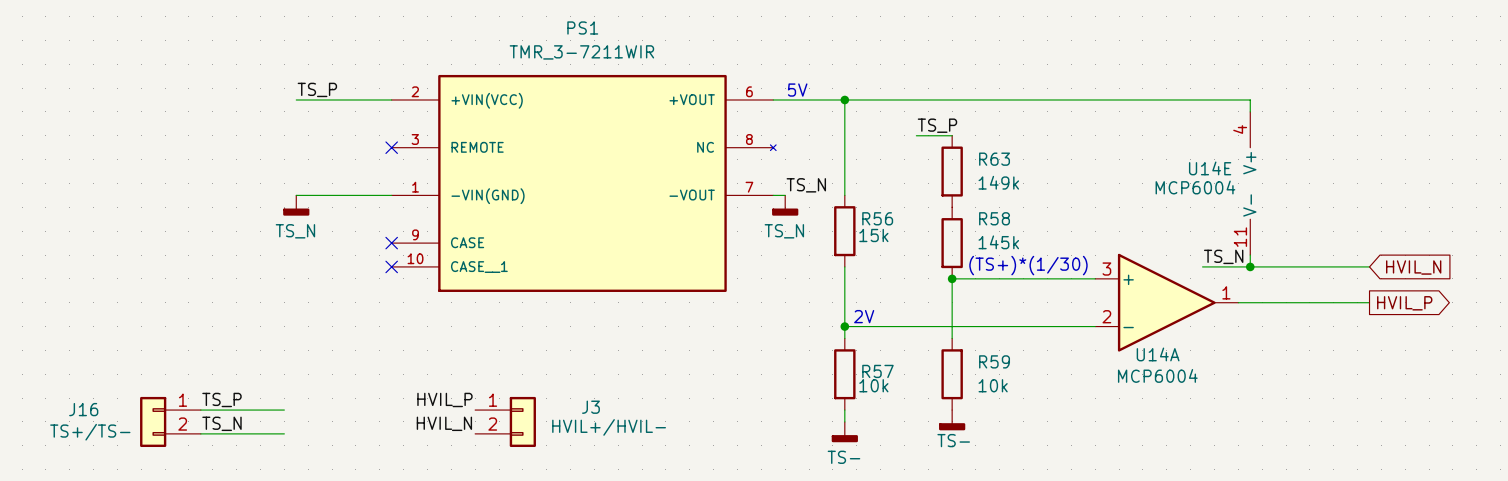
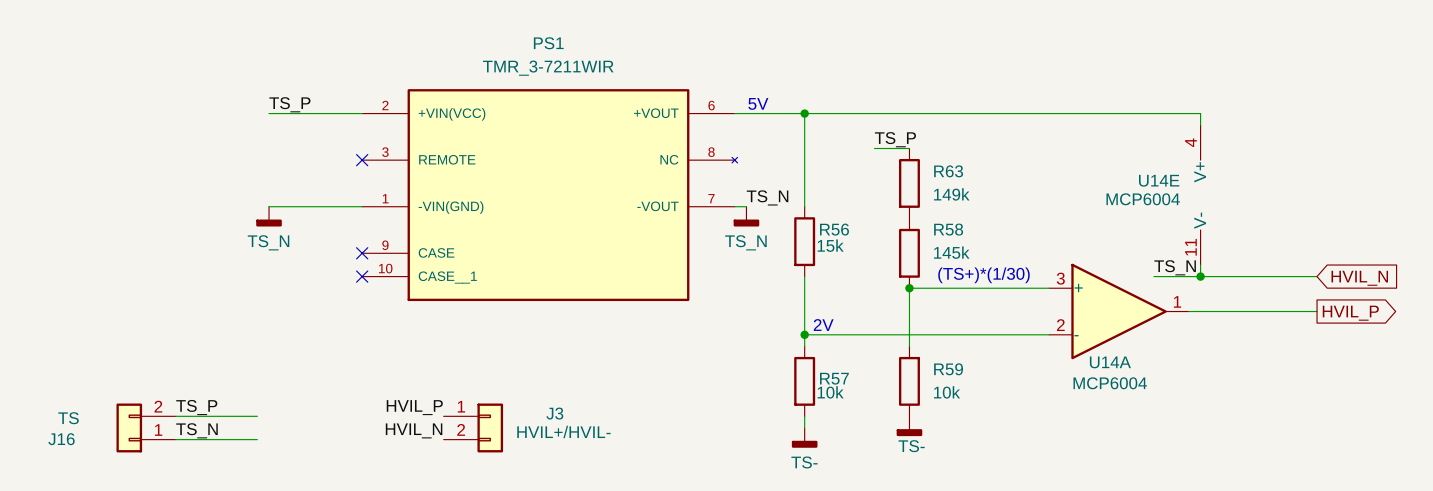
J16 flip: as is (153, 421) -> up-down (129, 427)
J16 value: TS+/TS- (90, 432) -> TS (68, 418)

